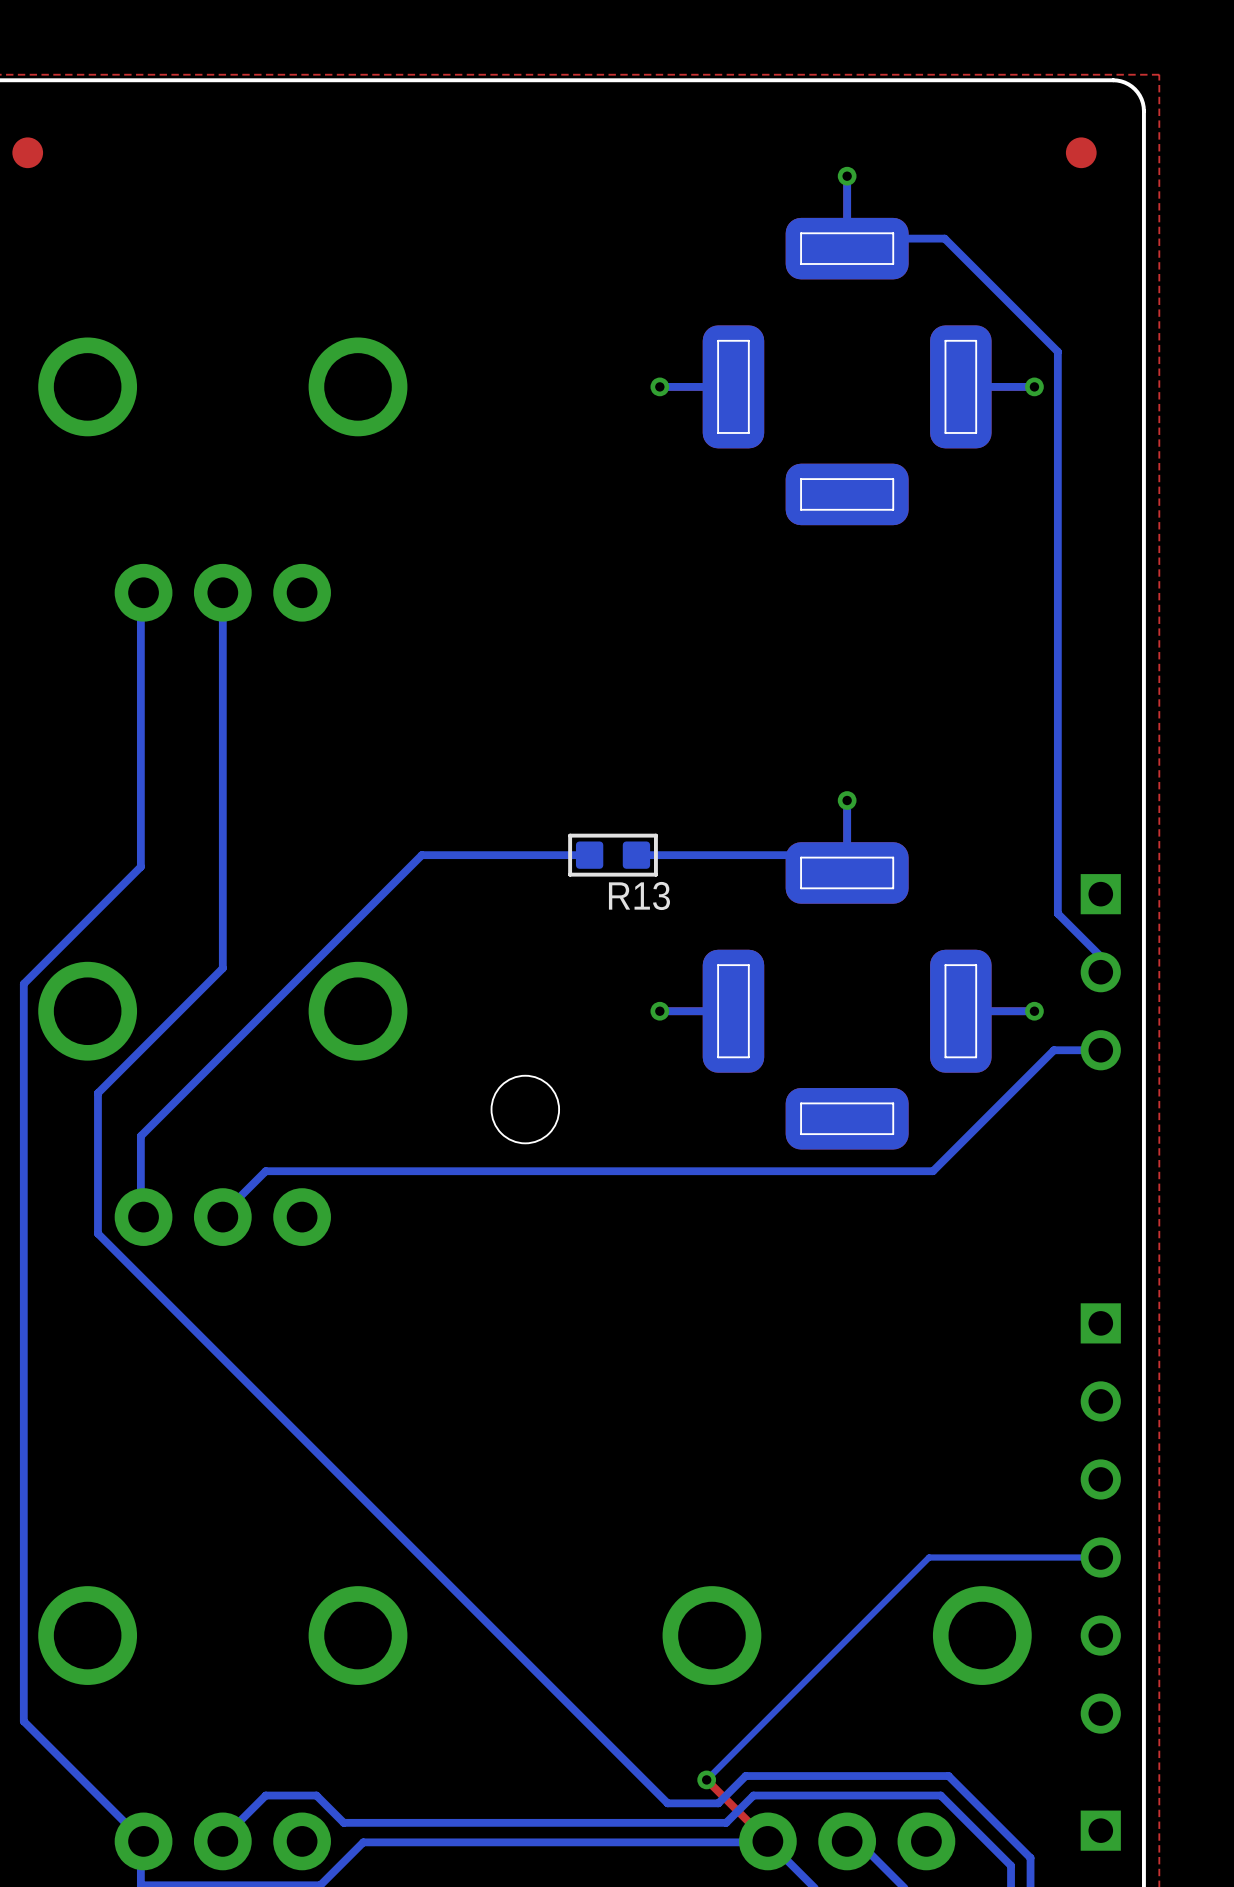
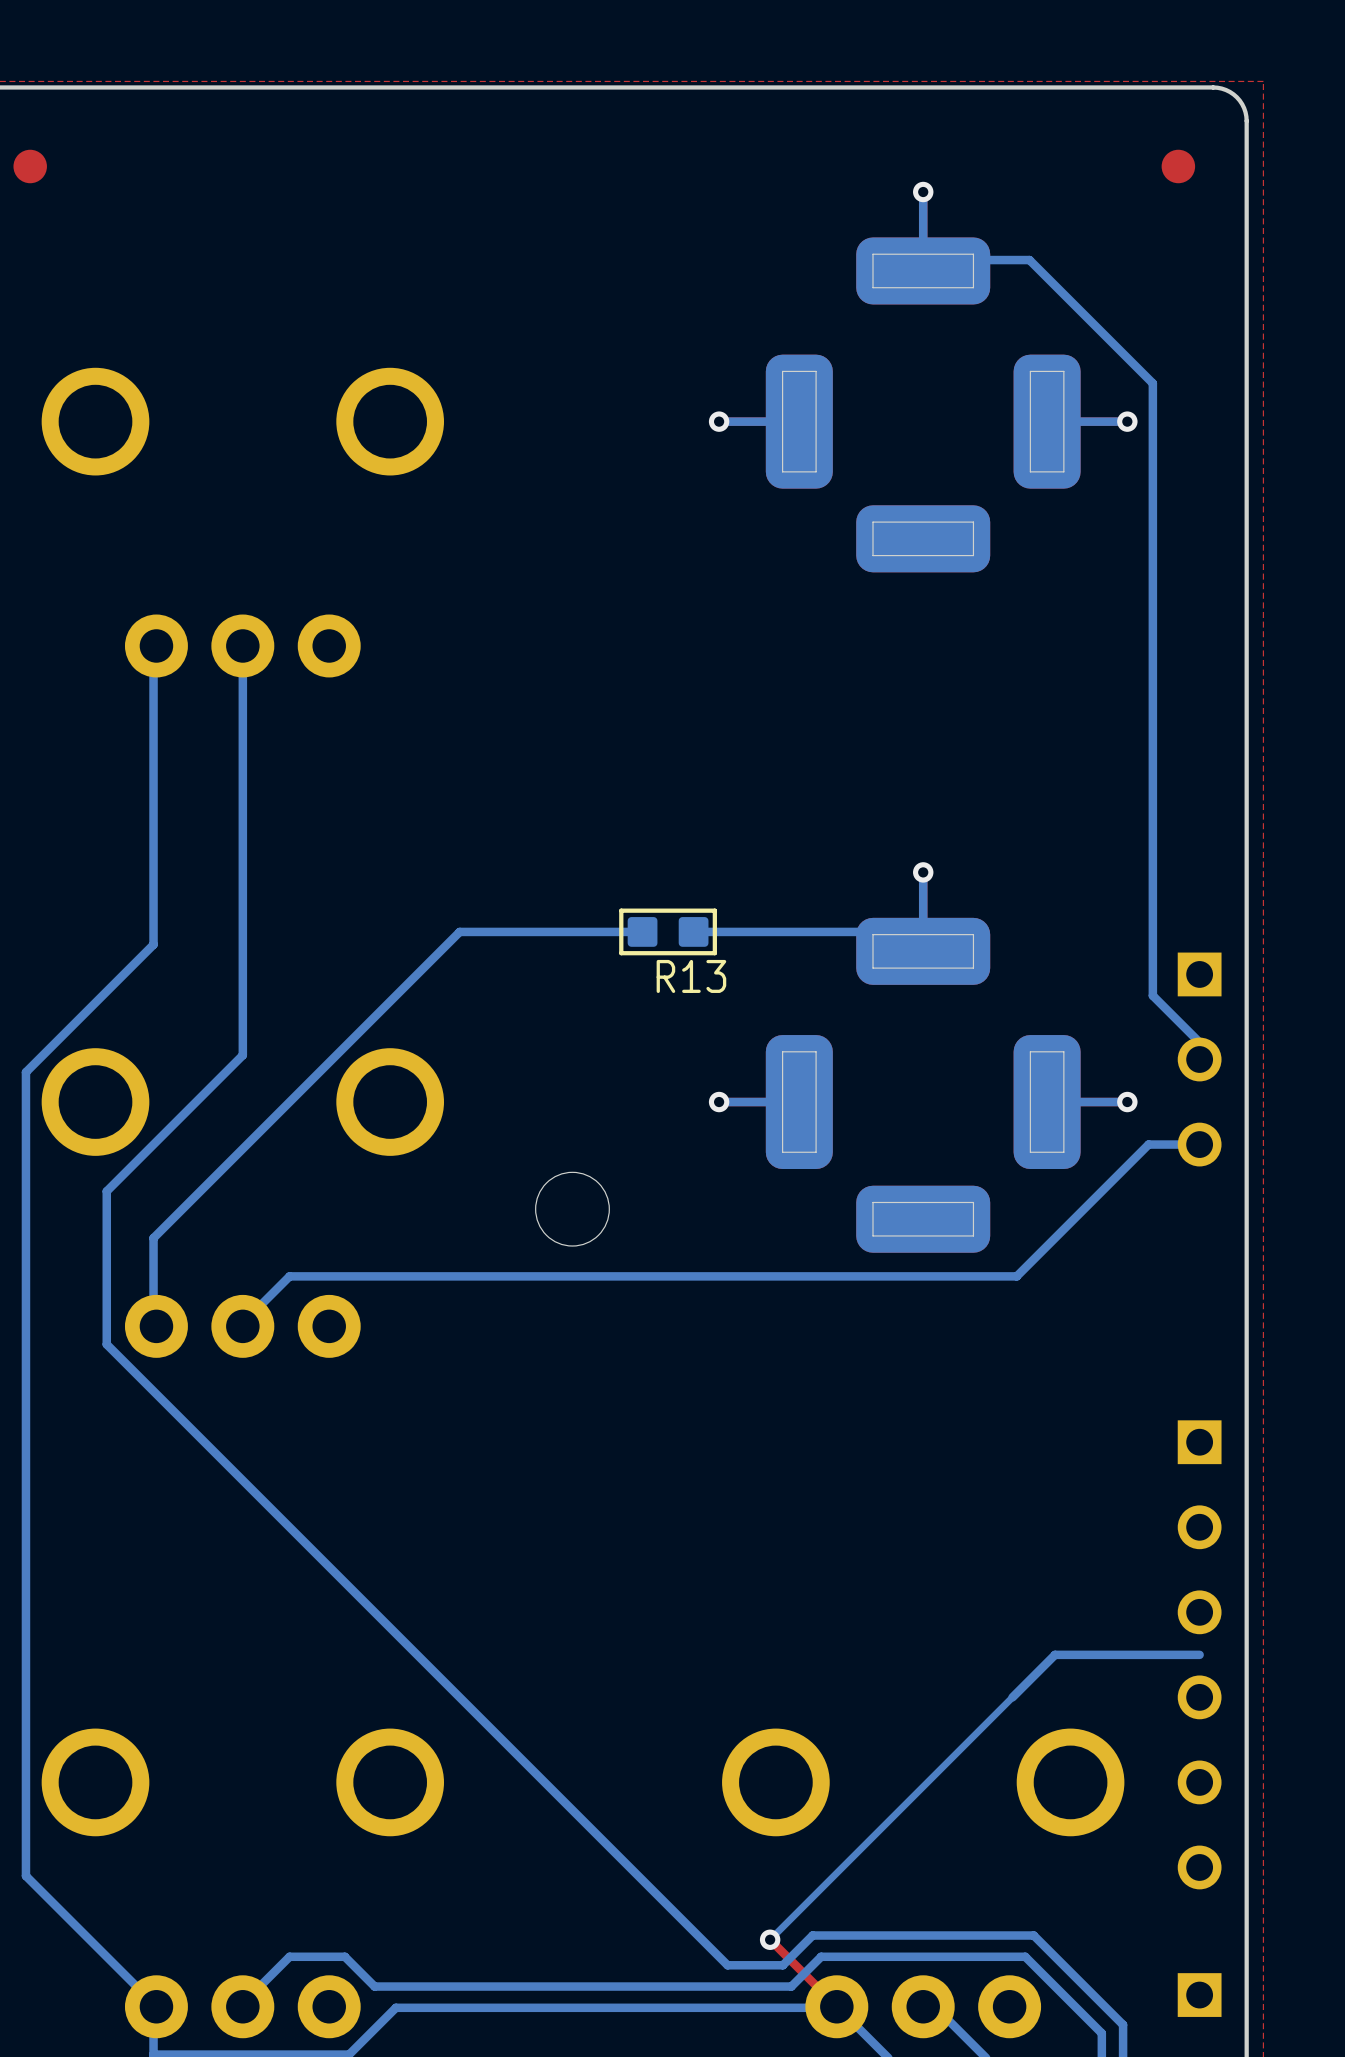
bottom track: (1100, 1557) (929, 1557) -> (1199, 1654) (1055, 1654) (1012, 1697)

